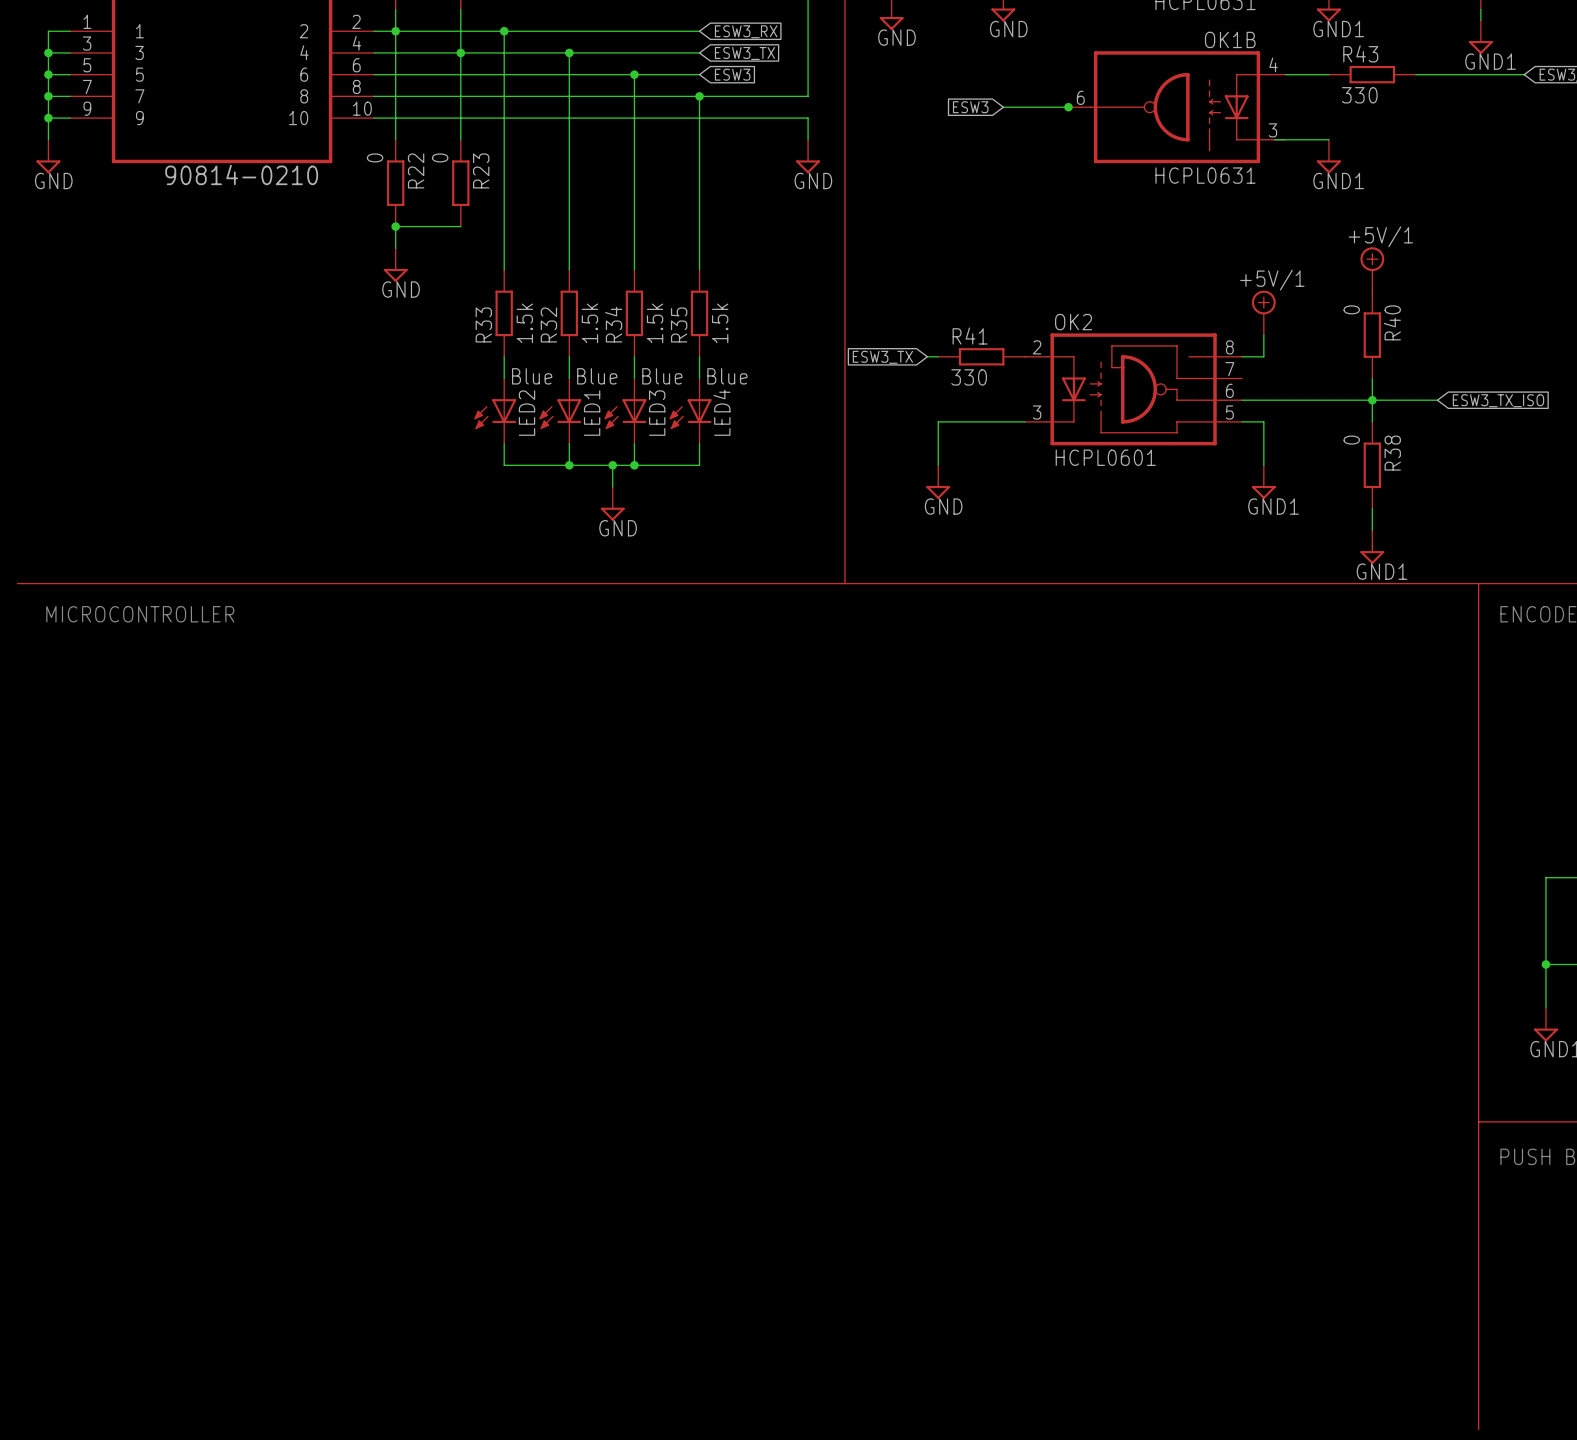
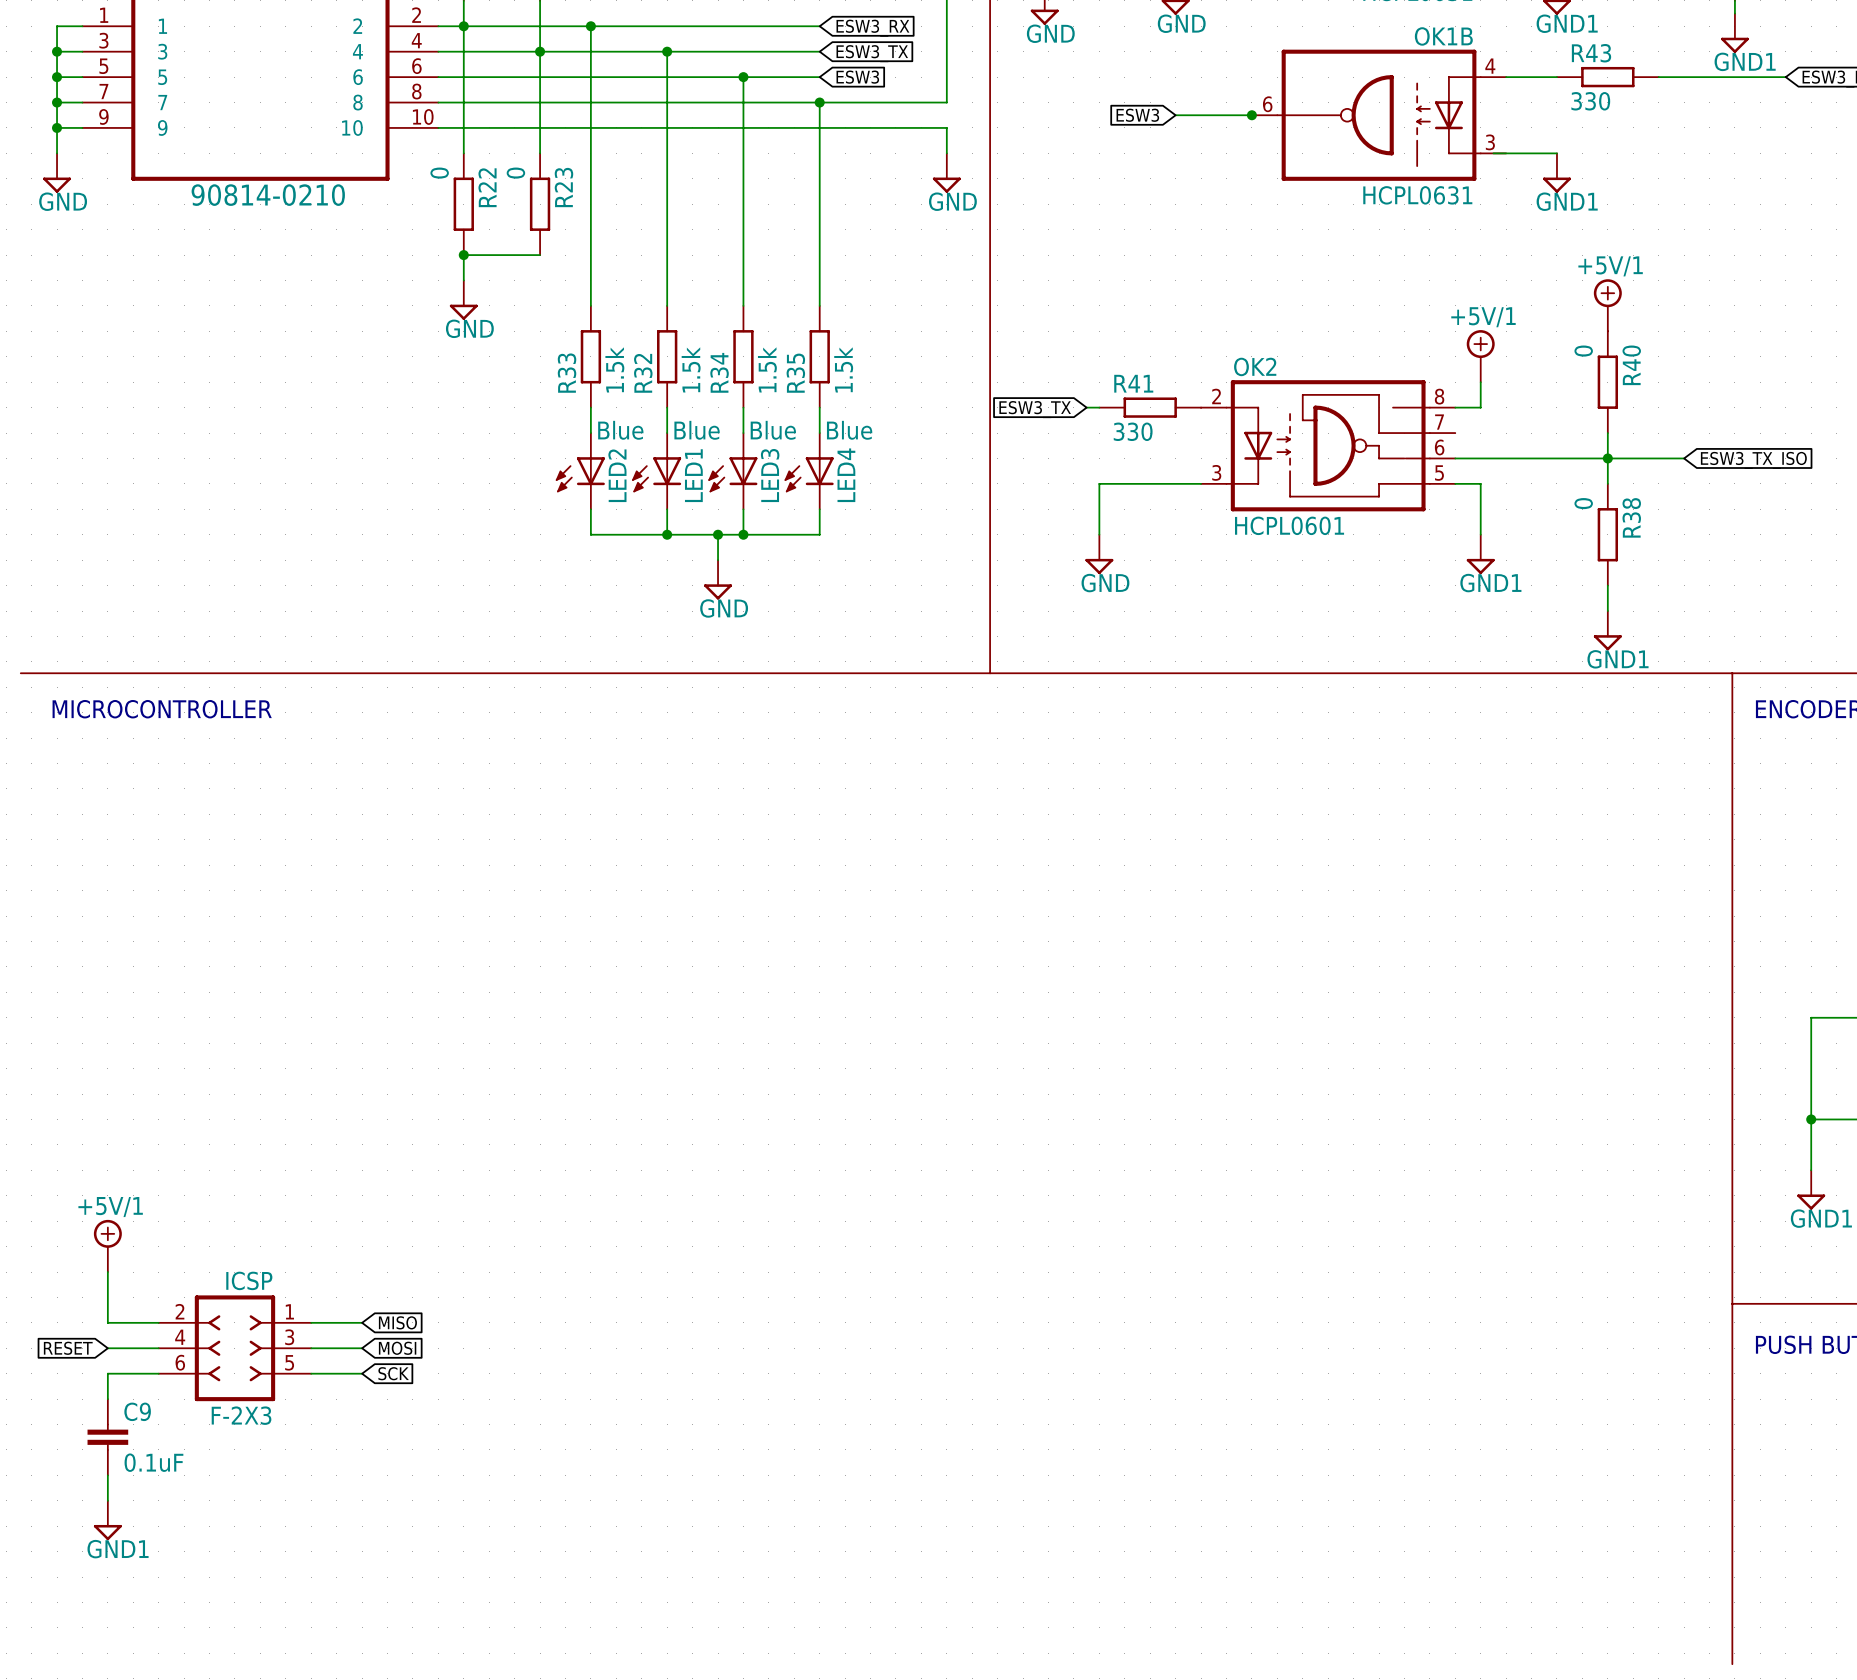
power symbol: none -> +5V/1 (107, 1245)
wire: none -> (107, 1272) (107, 1322) (158, 1322)
wire: none -> (311, 1322) (362, 1322)
global label: none -> MISO (397, 1322)
global label: none -> RESET (68, 1348)
wire: none -> (107, 1348) (158, 1348)
ICSP: none -> F-2X3 (234, 1348)
wire: none -> (311, 1348) (362, 1348)
global label: none -> MOSI (397, 1348)
wire: none -> (158, 1373) (107, 1373) (107, 1399)
wire: none -> (311, 1373) (362, 1373)
global label: none -> SCK (393, 1373)
C9: none -> 0.1uF (107, 1437)
wire: none -> (107, 1475) (107, 1500)
power symbol: none -> GND1 (107, 1520)

